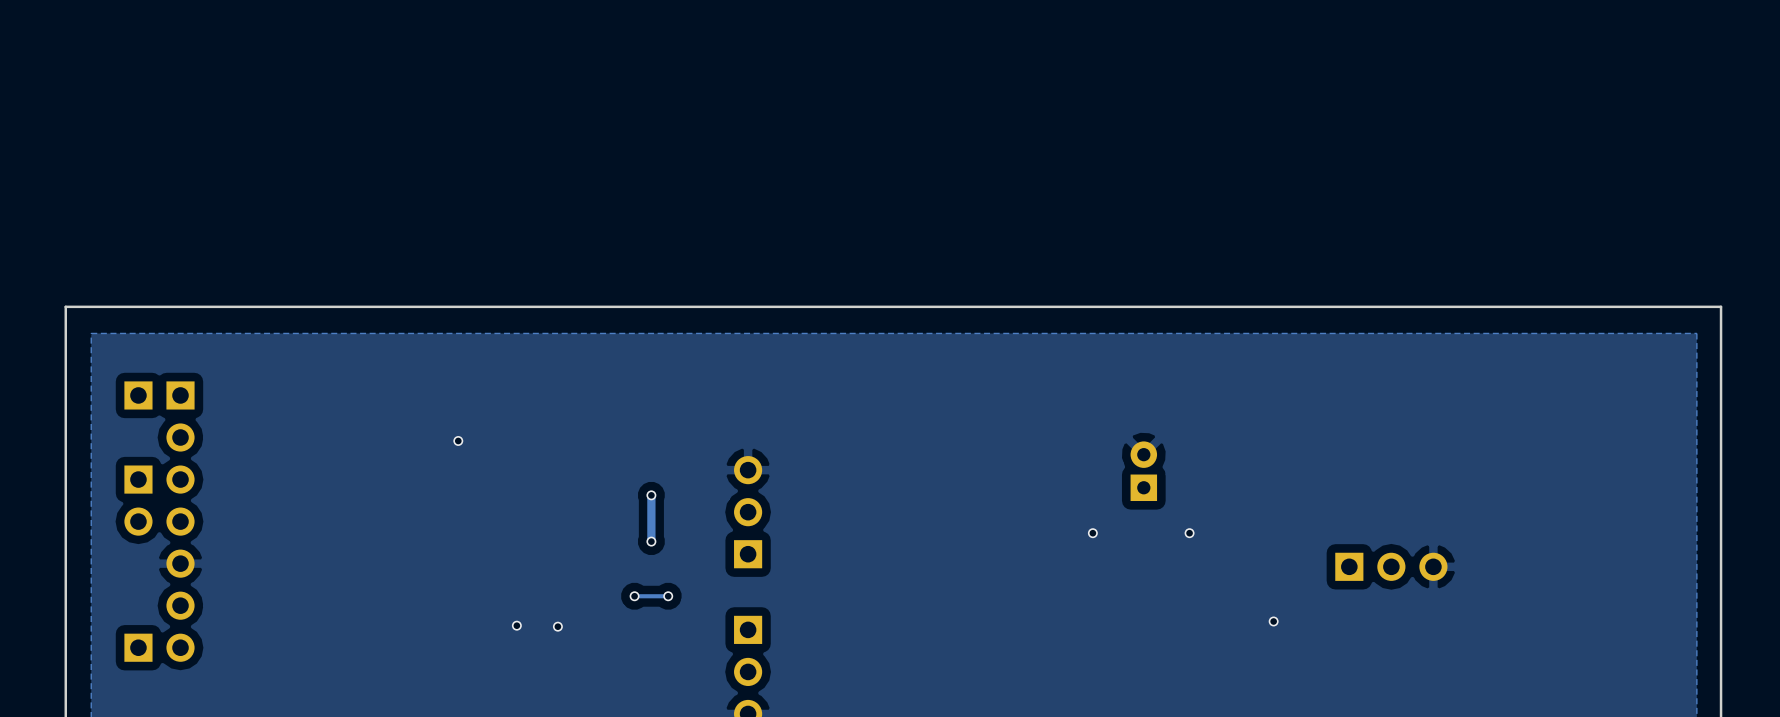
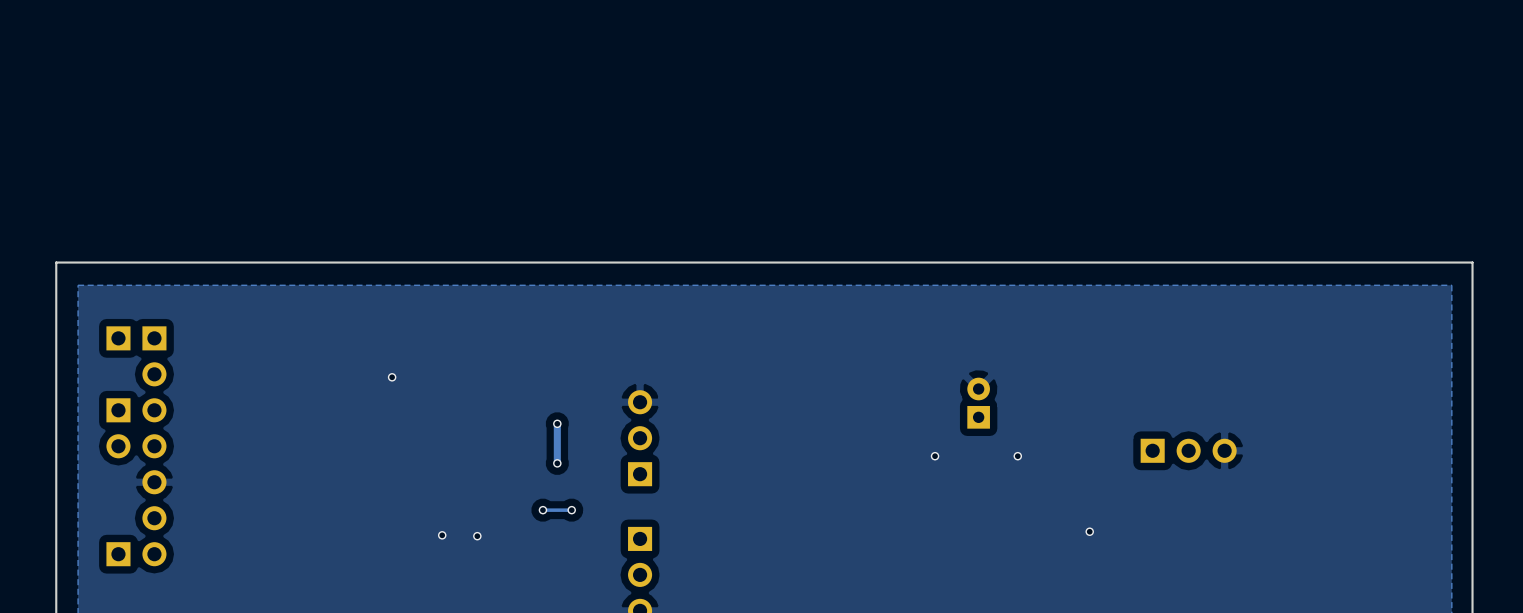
part position: (1391, 566) -> (1188, 450)

